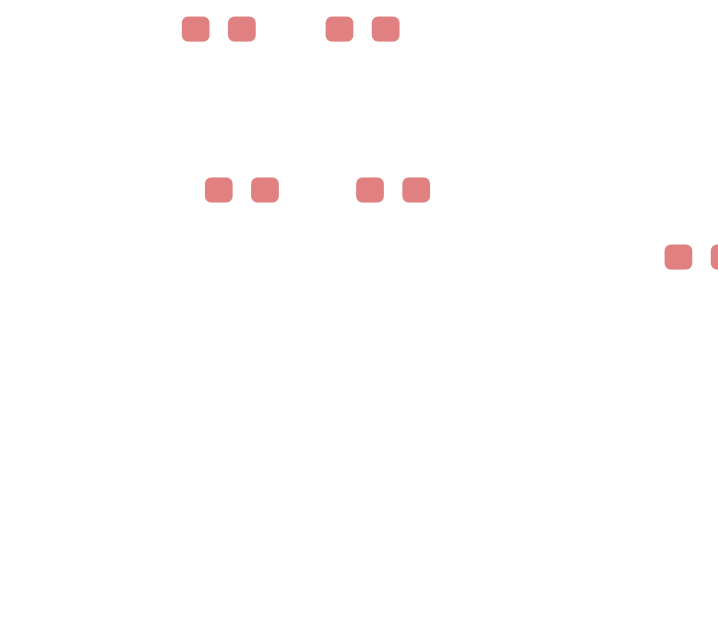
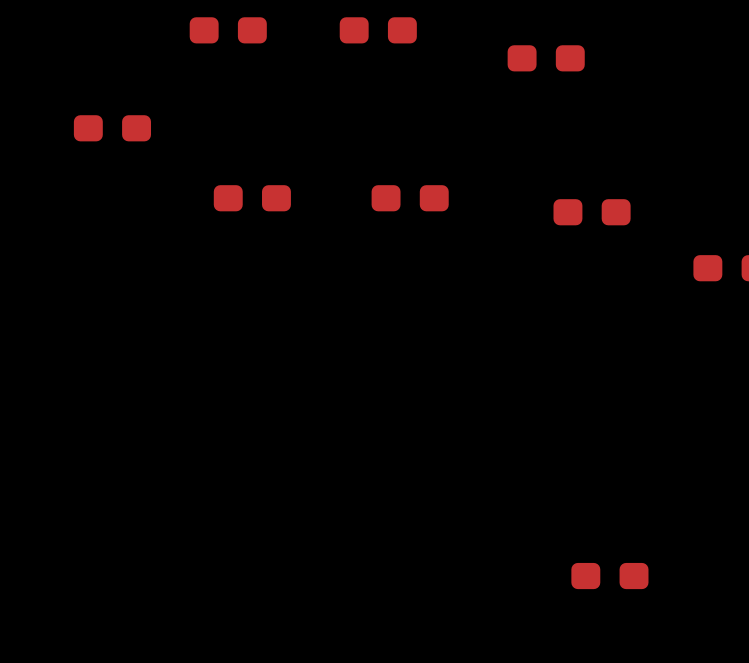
part: none -> (546, 58)
part: none -> (112, 128)
part: none -> (592, 212)
part: none -> (609, 576)

